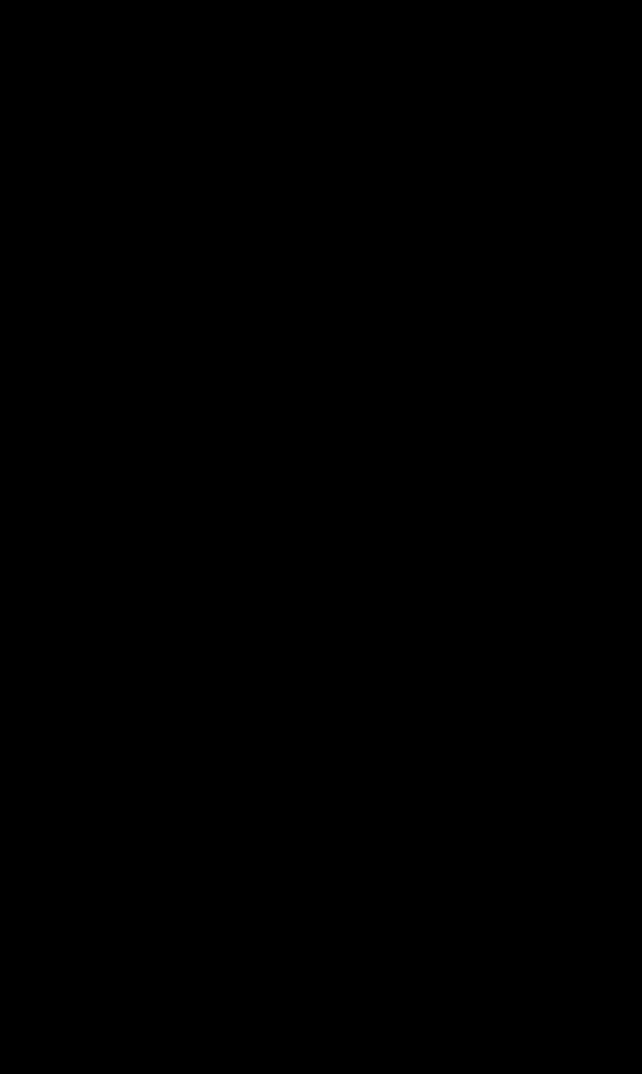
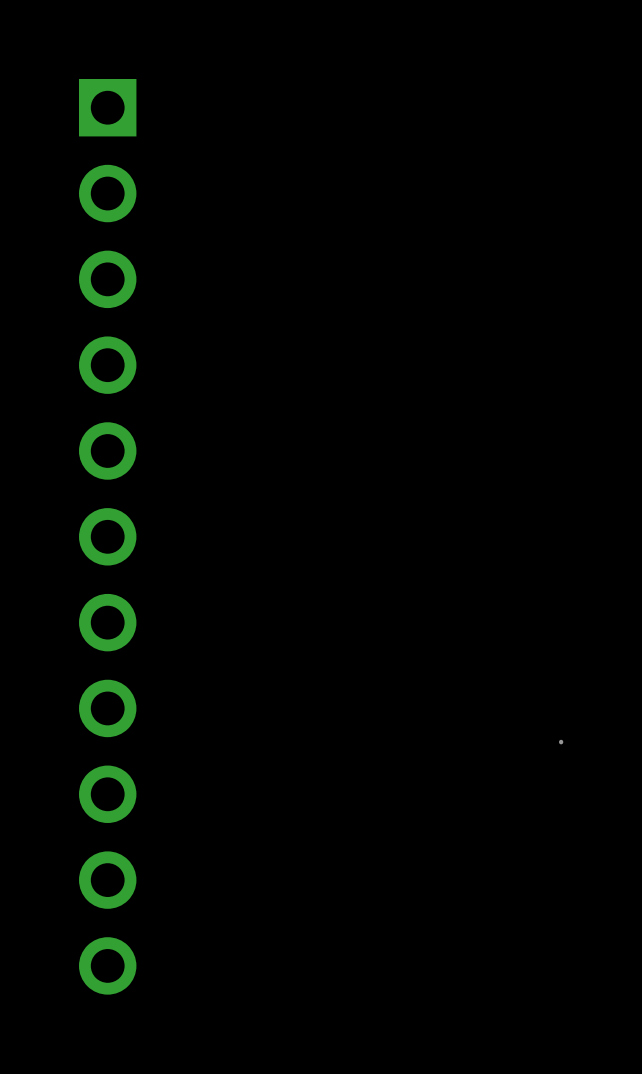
part: none -> (107, 536)
part: none -> (561, 742)

